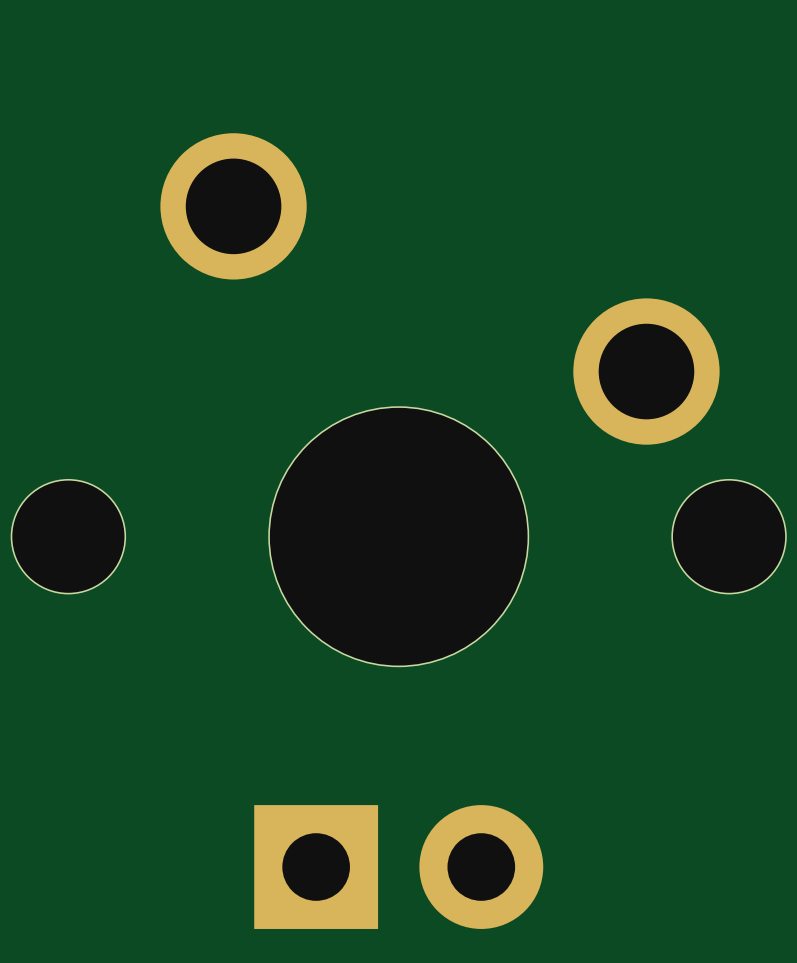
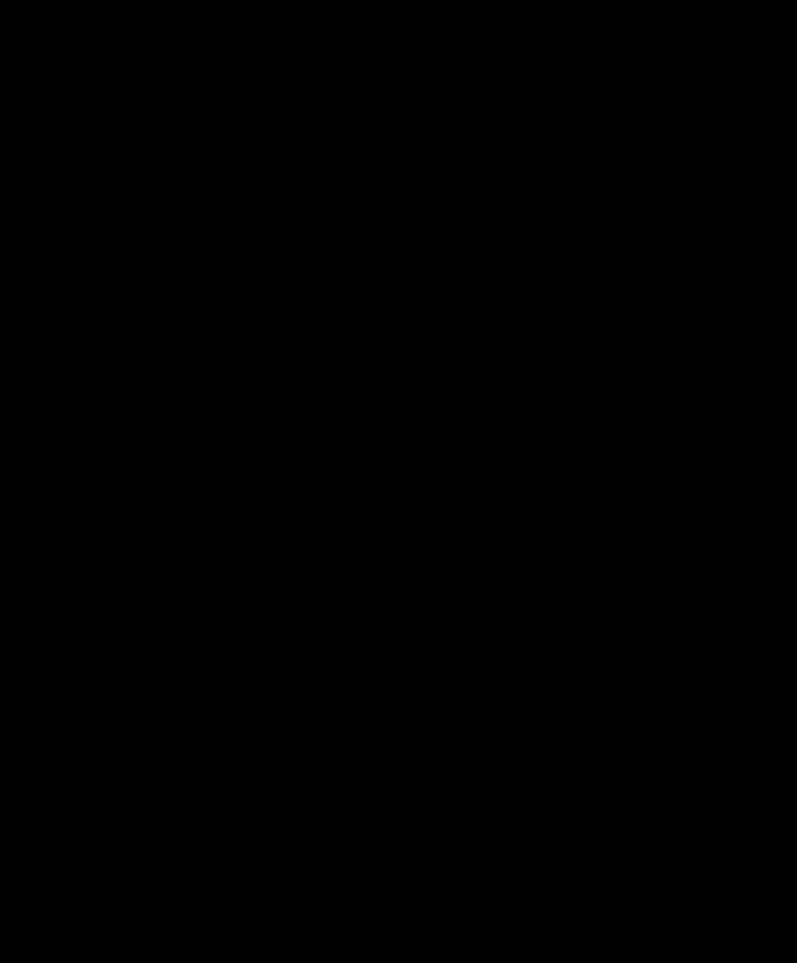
part: (398, 531) -> none

